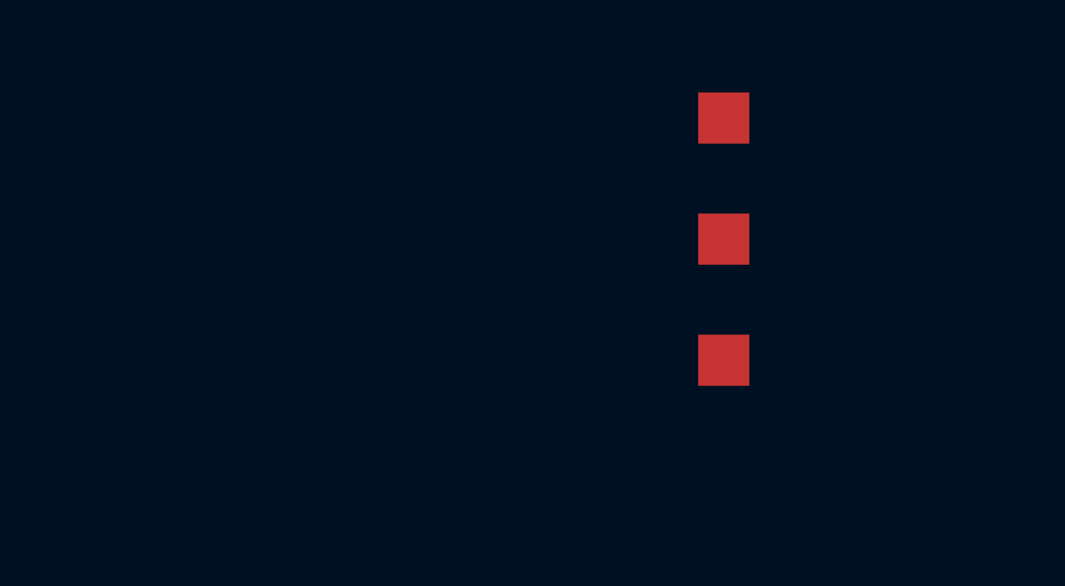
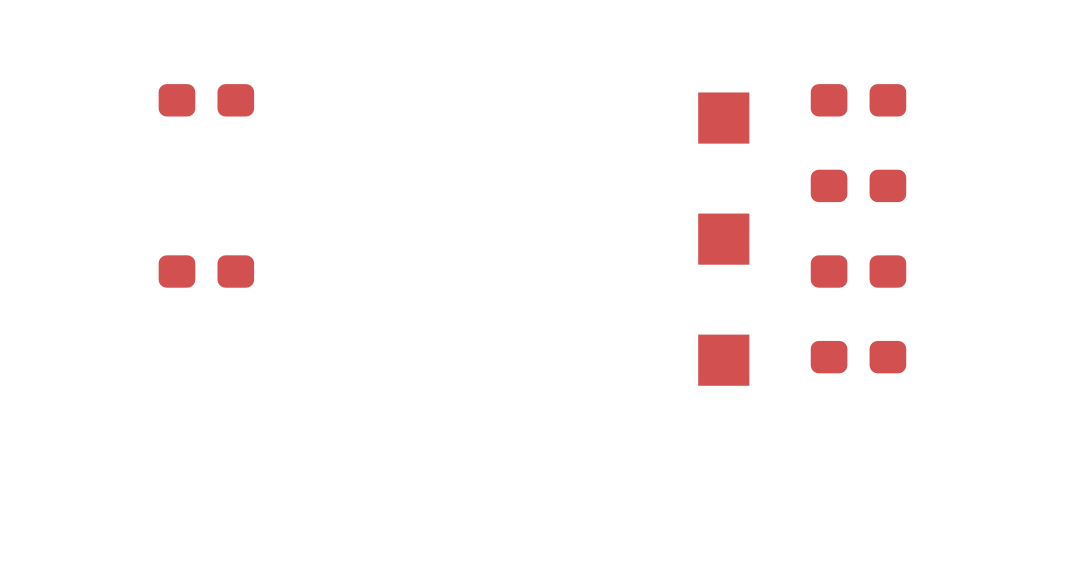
part: none -> (206, 100)
part: none -> (858, 100)
part: none -> (858, 185)
part: none -> (206, 271)
part: none -> (858, 271)
part: none -> (858, 357)

